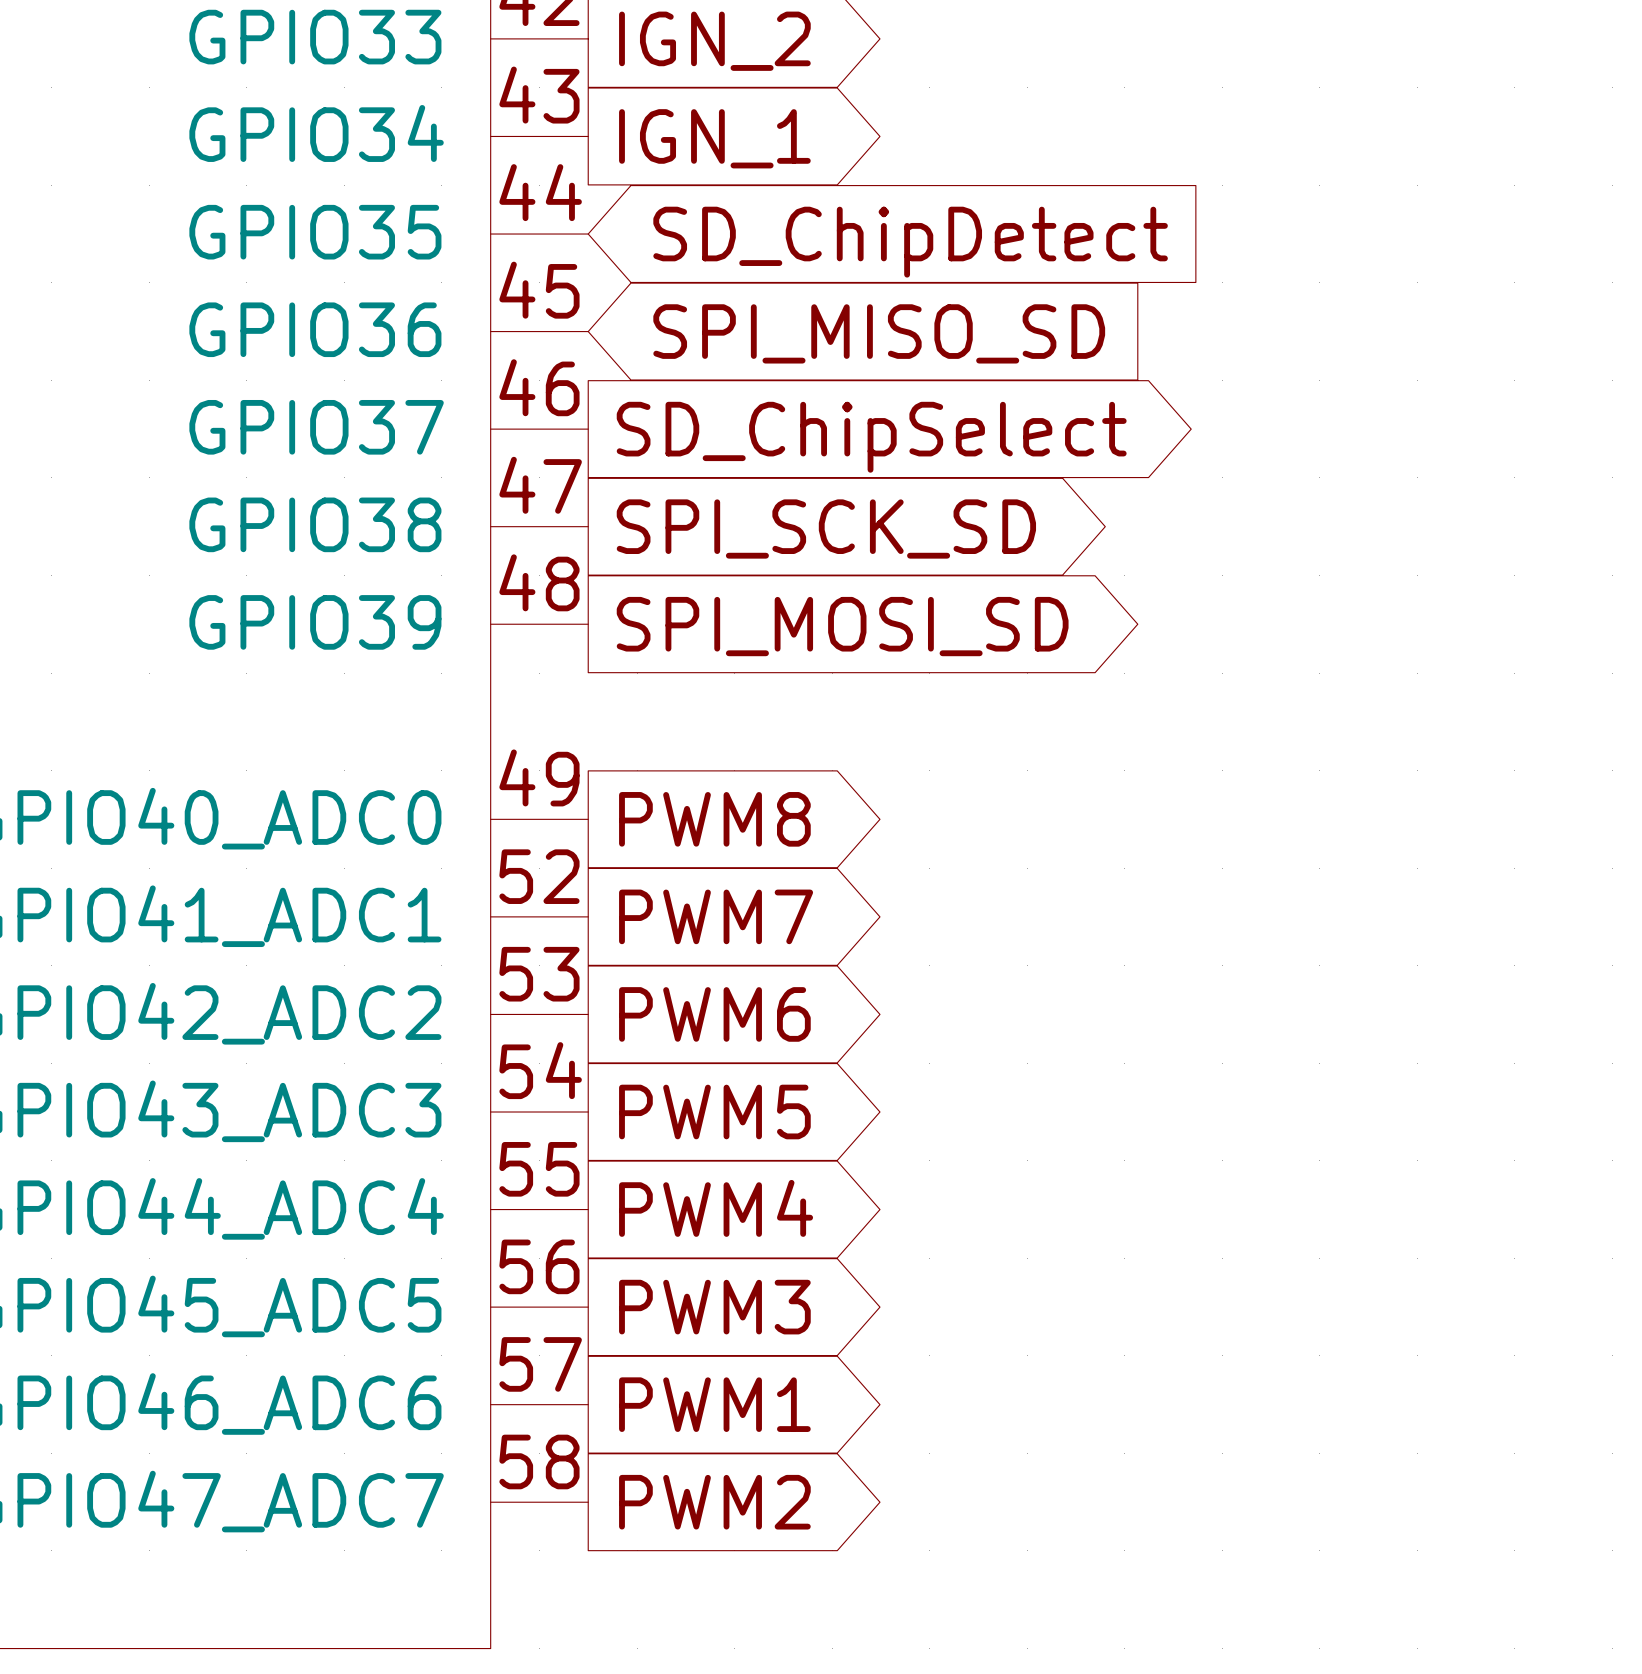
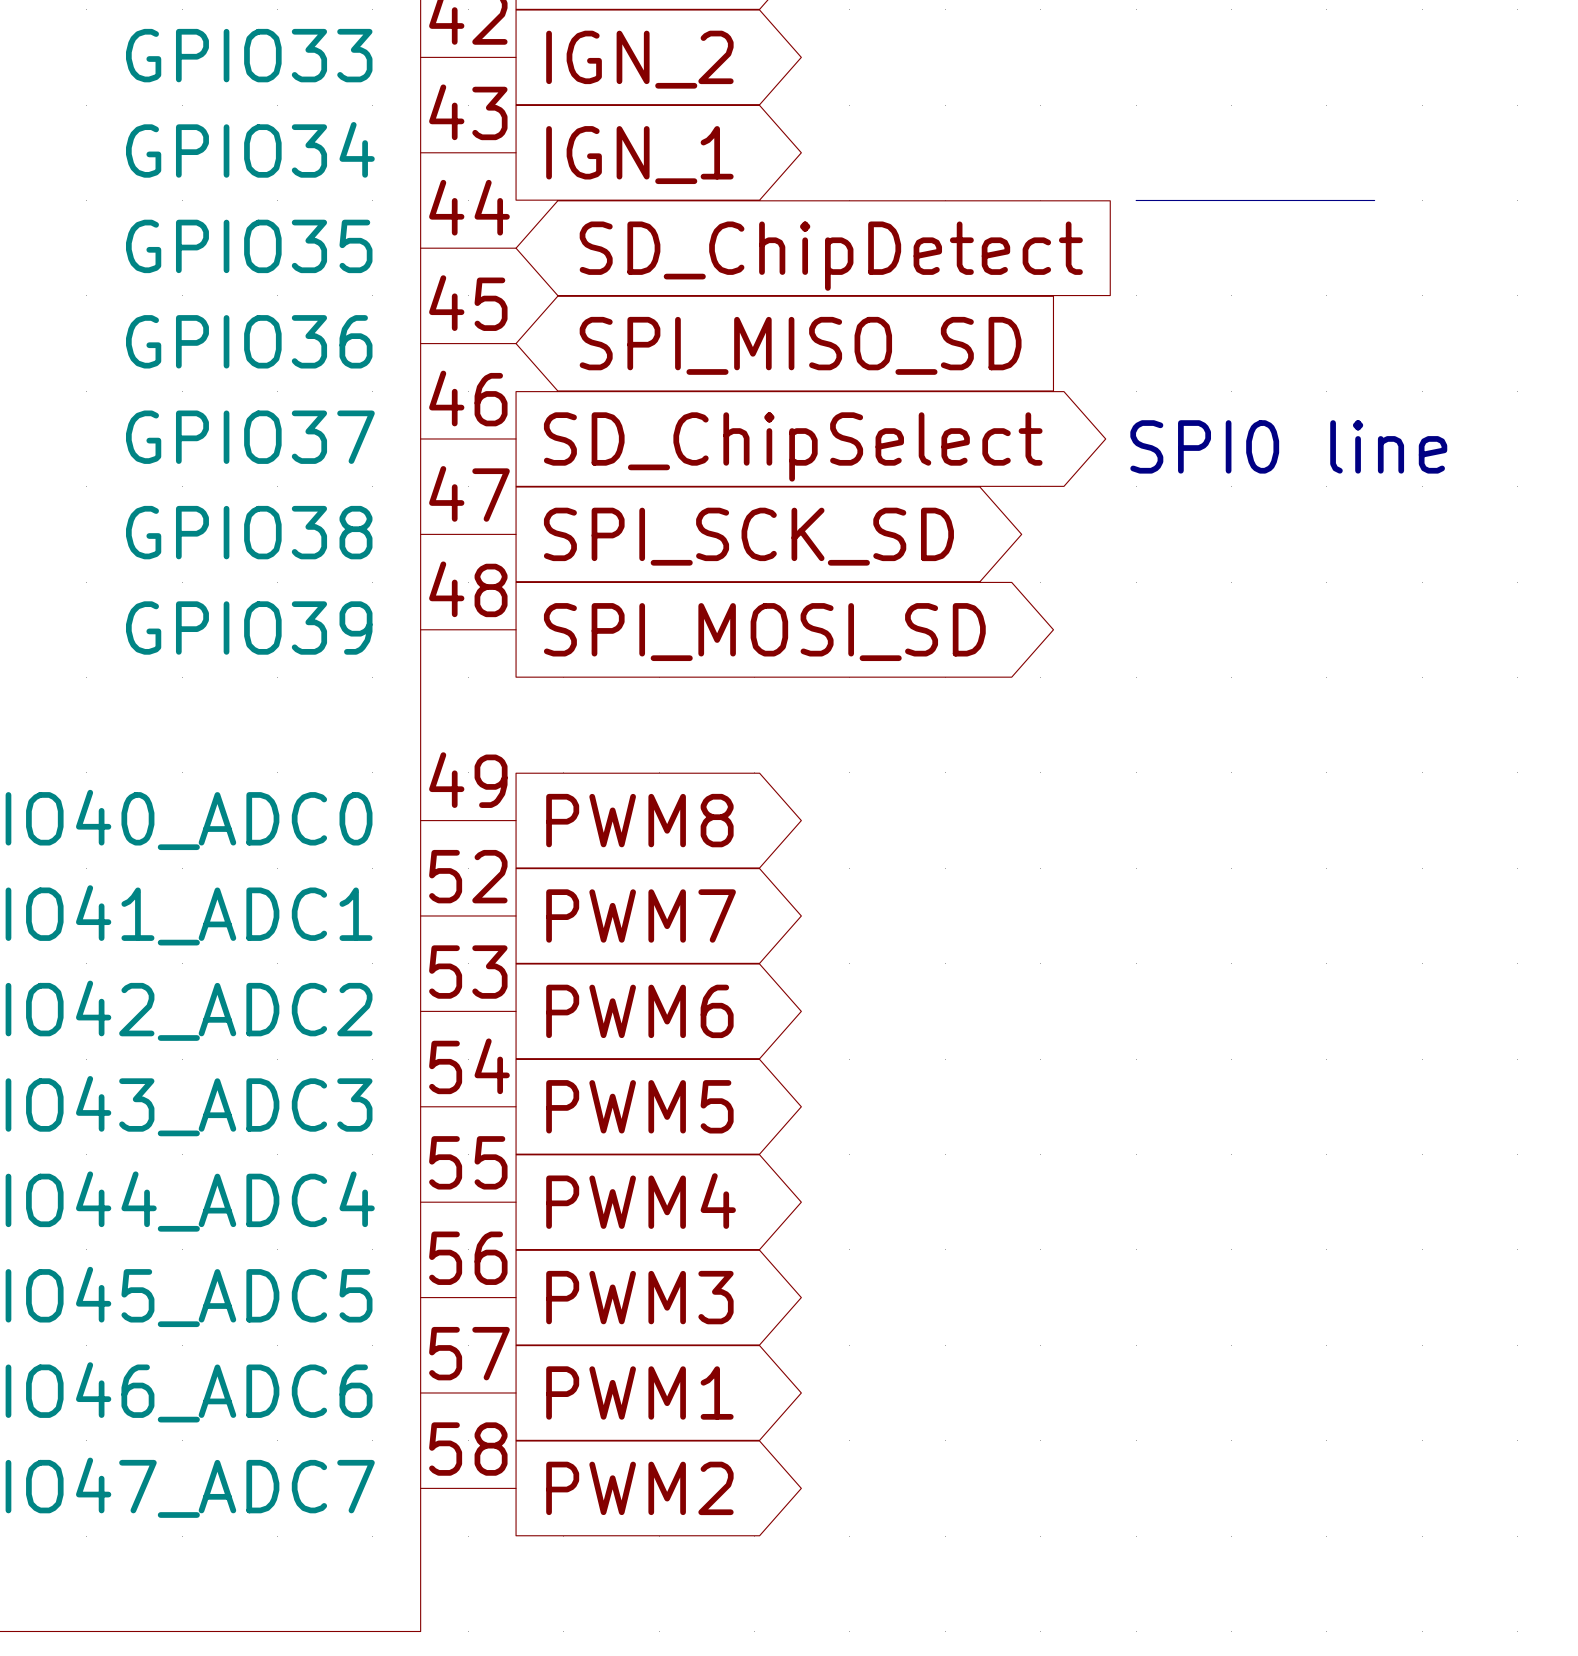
line: none -> (1136, 200) (1374, 200)
text: none -> SPI0 line (1288, 446)

